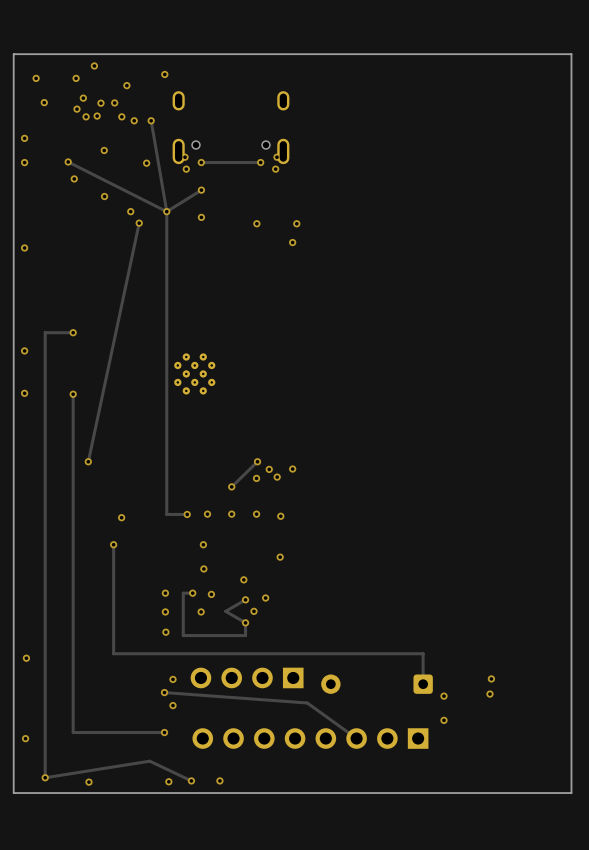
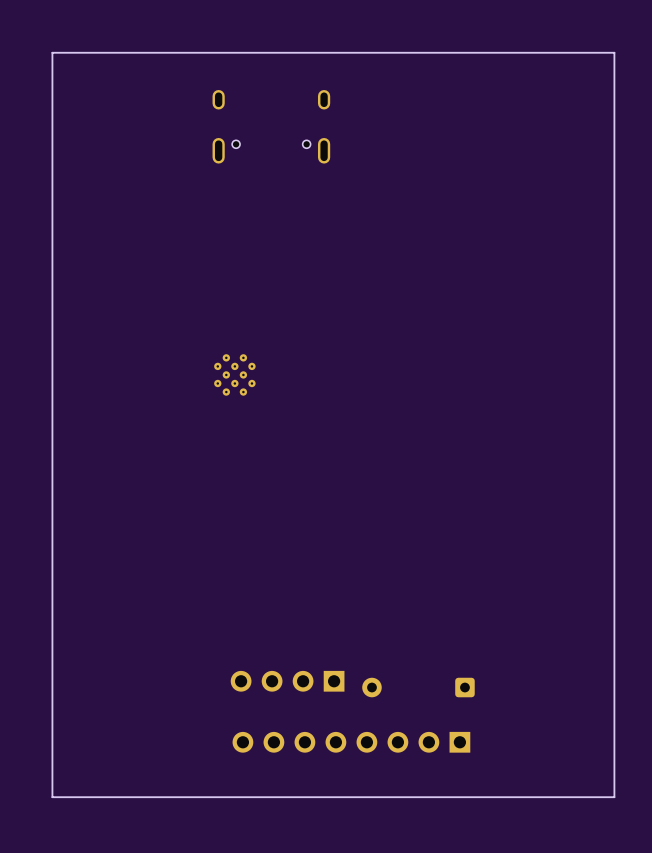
via: (94, 65) -> none
via: (164, 74) -> none
via: (36, 78) -> none
via: (76, 78) -> none
via: (126, 85) -> none
via: (83, 98) -> none
via: (44, 102) -> none
via: (114, 102) -> none
via: (100, 103) -> none
via: (76, 109) -> none
via: (86, 116) -> none
via: (97, 116) -> none
via: (121, 116) -> none
via: (134, 120) -> none
track: (151, 120) (166, 211) -> none
via: (151, 120) -> none
via: (24, 138) -> none
via: (104, 150) -> none
via: (185, 157) -> none
via: (276, 157) -> none
track: (68, 161) (166, 211) -> none
via: (68, 161) -> none
via: (24, 162) -> none
via: (201, 162) -> none
track: (260, 162) (201, 162) -> none
via: (260, 162) -> none
via: (146, 163) -> none
via: (186, 169) -> none
via: (275, 169) -> none
via: (74, 178) -> none
track: (201, 190) (166, 211) -> none
via: (201, 190) -> none
via: (104, 196) -> none
via: (130, 211) -> none
track: (166, 211) (166, 514) (187, 514) -> none
via: (166, 211) -> none
via: (201, 217) -> none
track: (139, 223) (88, 461) -> none
via: (139, 223) -> none
via: (256, 223) -> none
via: (296, 223) -> none
via: (292, 242) -> none
via: (24, 247) -> none
track: (73, 332) (45, 332) (45, 777) (149, 761) (191, 780) -> none
via: (73, 332) -> none
via: (24, 350) -> none
via: (24, 393) -> none
track: (73, 394) (73, 732) (164, 732) -> none
via: (73, 394) -> none
via: (88, 461) -> none
track: (257, 461) (231, 486) -> none
via: (257, 461) -> none
via: (269, 469) -> none
via: (292, 469) -> none
via: (277, 477) -> none
via: (256, 478) -> none
via: (231, 486) -> none
via: (187, 514) -> none
via: (207, 514) -> none
via: (231, 514) -> none
via: (256, 514) -> none
via: (280, 516) -> none
via: (121, 517) -> none
track: (113, 544) (113, 653) (423, 653) (423, 684) -> none
via: (113, 544) -> none
via: (203, 544) -> none
via: (280, 557) -> none
via: (203, 568) -> none
via: (243, 579) -> none
via: (165, 593) -> none
track: (192, 593) (183, 593) (183, 635) (245, 635) (245, 622) (225, 611) (245, 599) -> none
via: (192, 593) -> none
via: (211, 594) -> none
via: (265, 598) -> none
via: (245, 599) -> none
via: (165, 611) -> none
via: (201, 611) -> none
via: (253, 611) -> none
via: (245, 622) -> none
via: (165, 632) -> none
via: (26, 658) -> none
via: (491, 678) -> none
via: (172, 679) -> none
track: (164, 692) (307, 703) (356, 738) -> none
via: (164, 692) -> none
via: (489, 694) -> none
via: (443, 696) -> none
via: (172, 705) -> none
via: (443, 720) -> none
via: (164, 732) -> none
via: (25, 738) -> none
via: (45, 777) -> none
via: (191, 780) -> none
via: (219, 780) -> none
via: (168, 781) -> none
via: (88, 782) -> none

